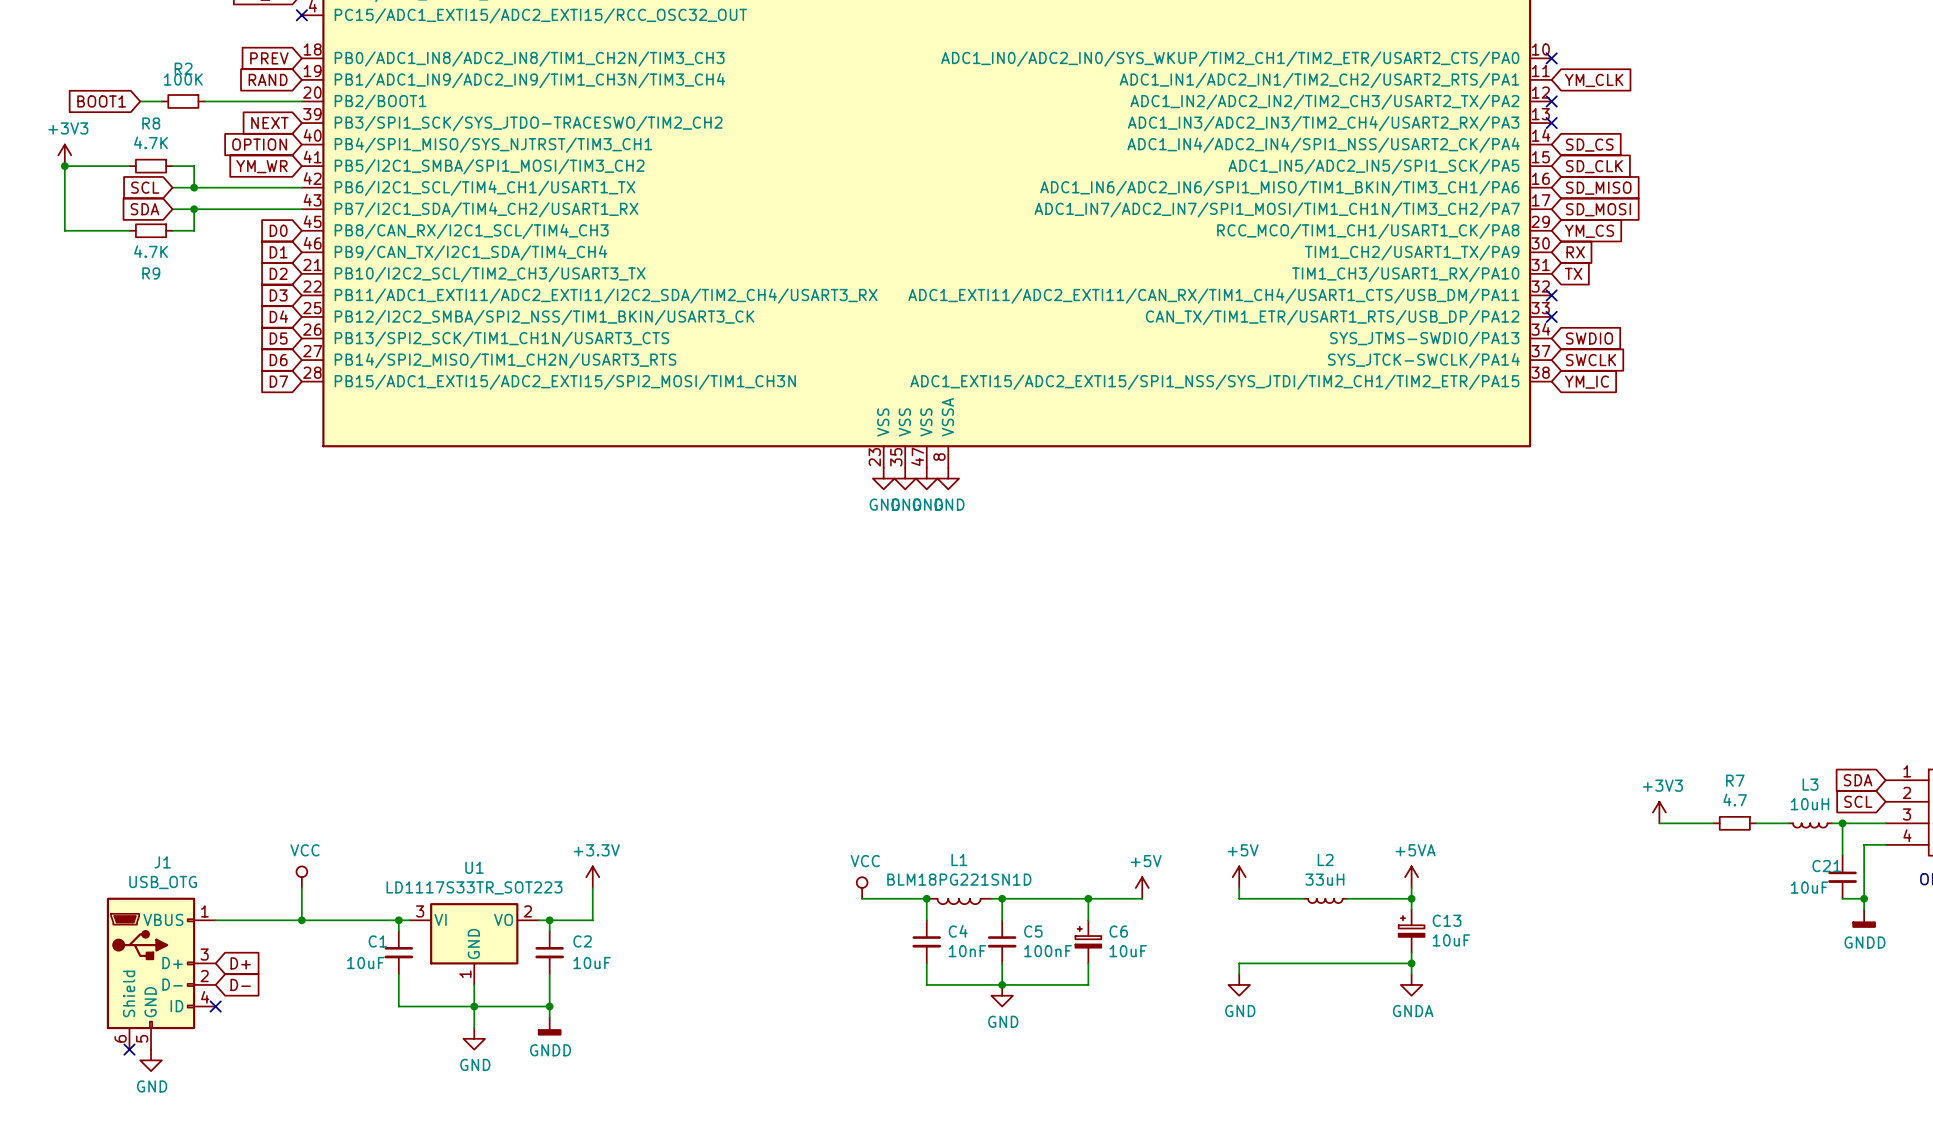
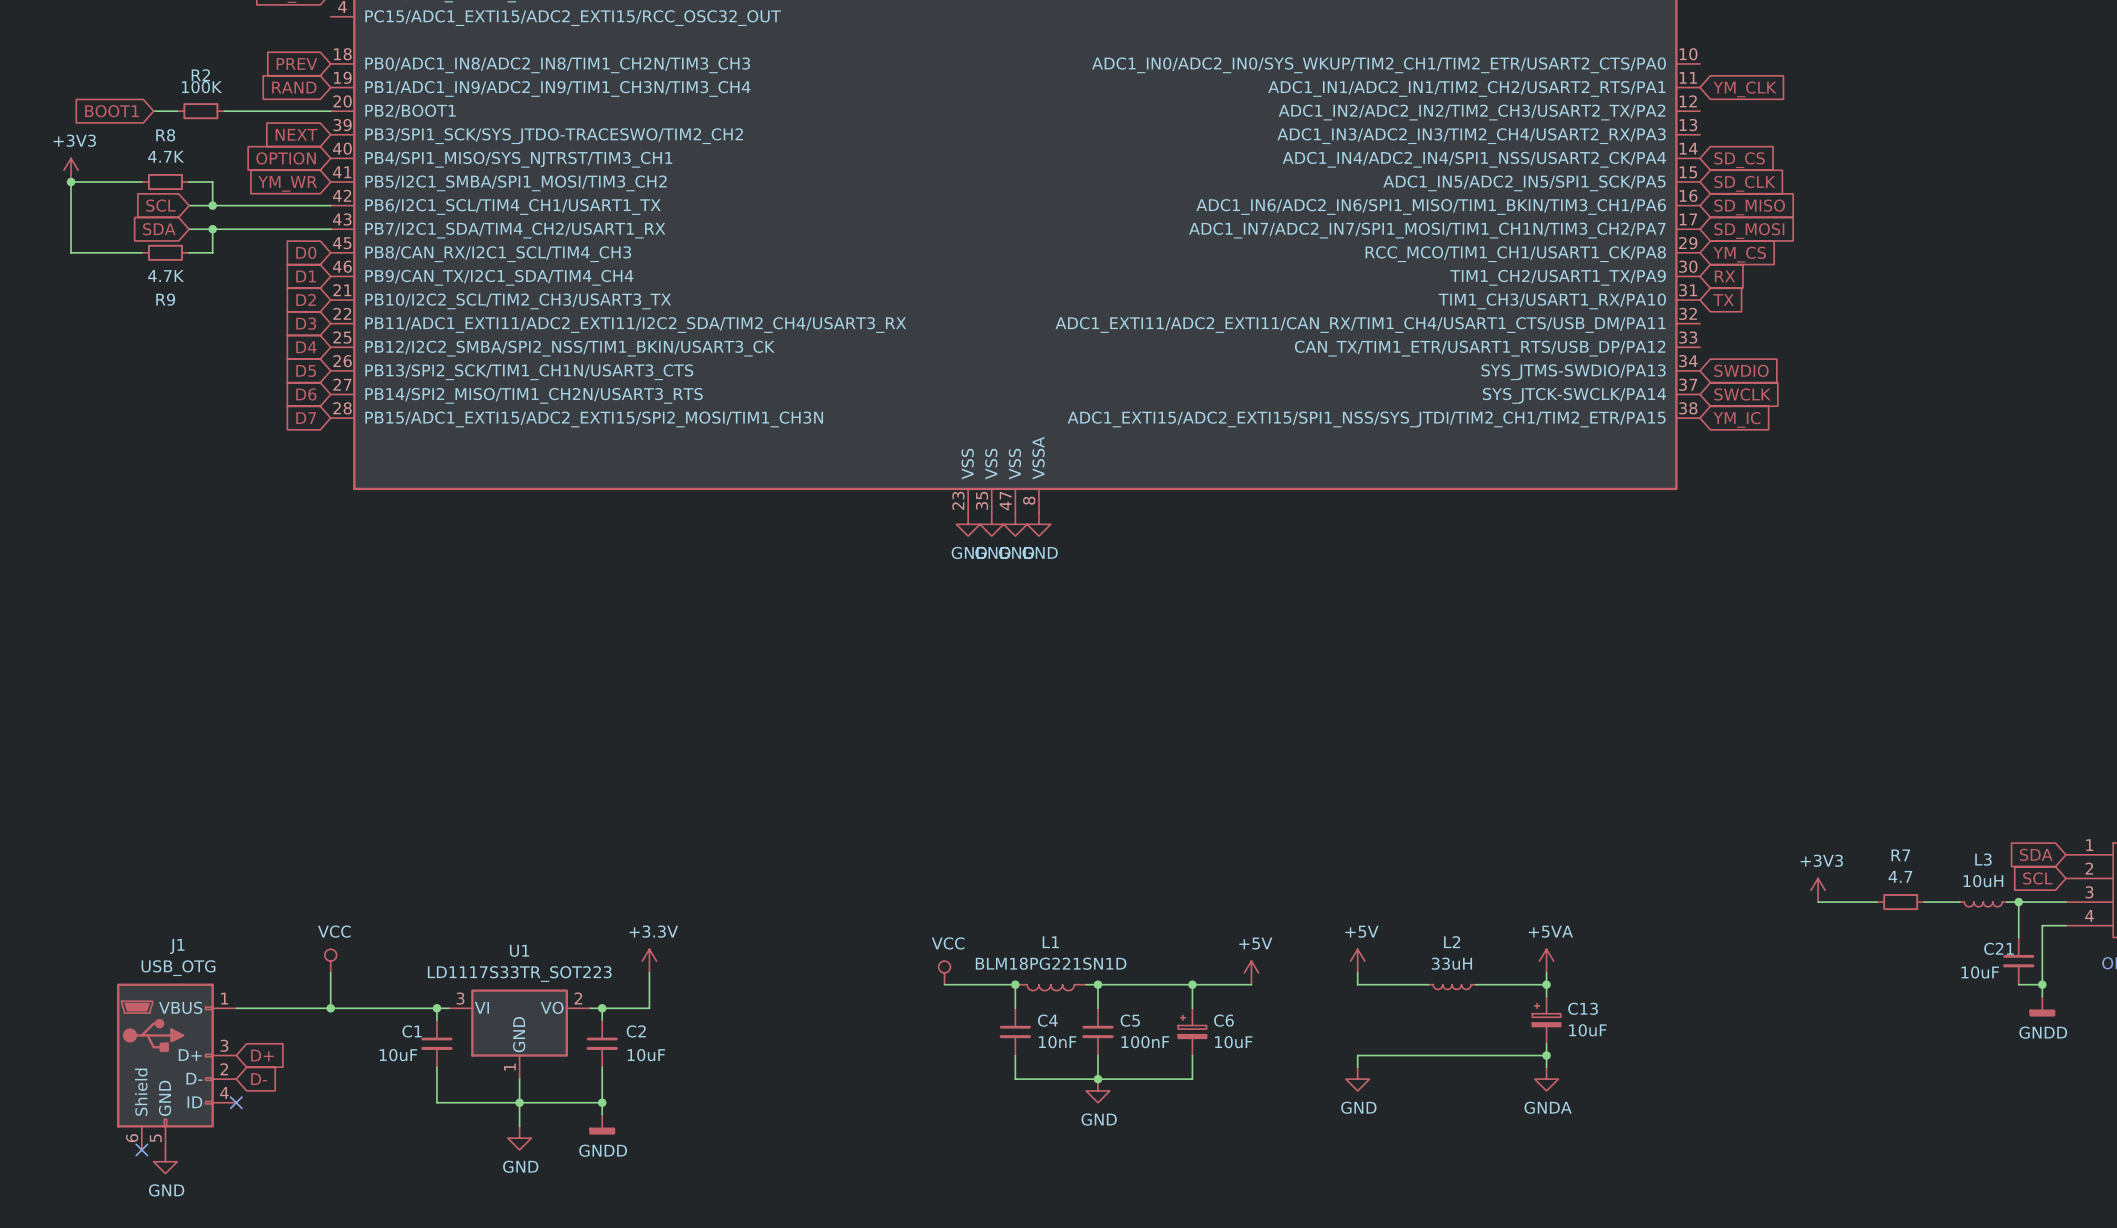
no-connect mark: (301, 15) -> none
no-connect mark: (1551, 58) -> none
no-connect mark: (1551, 101) -> none
no-connect mark: (1551, 123) -> none
no-connect mark: (1551, 295) -> none
no-connect mark: (1551, 316) -> none

